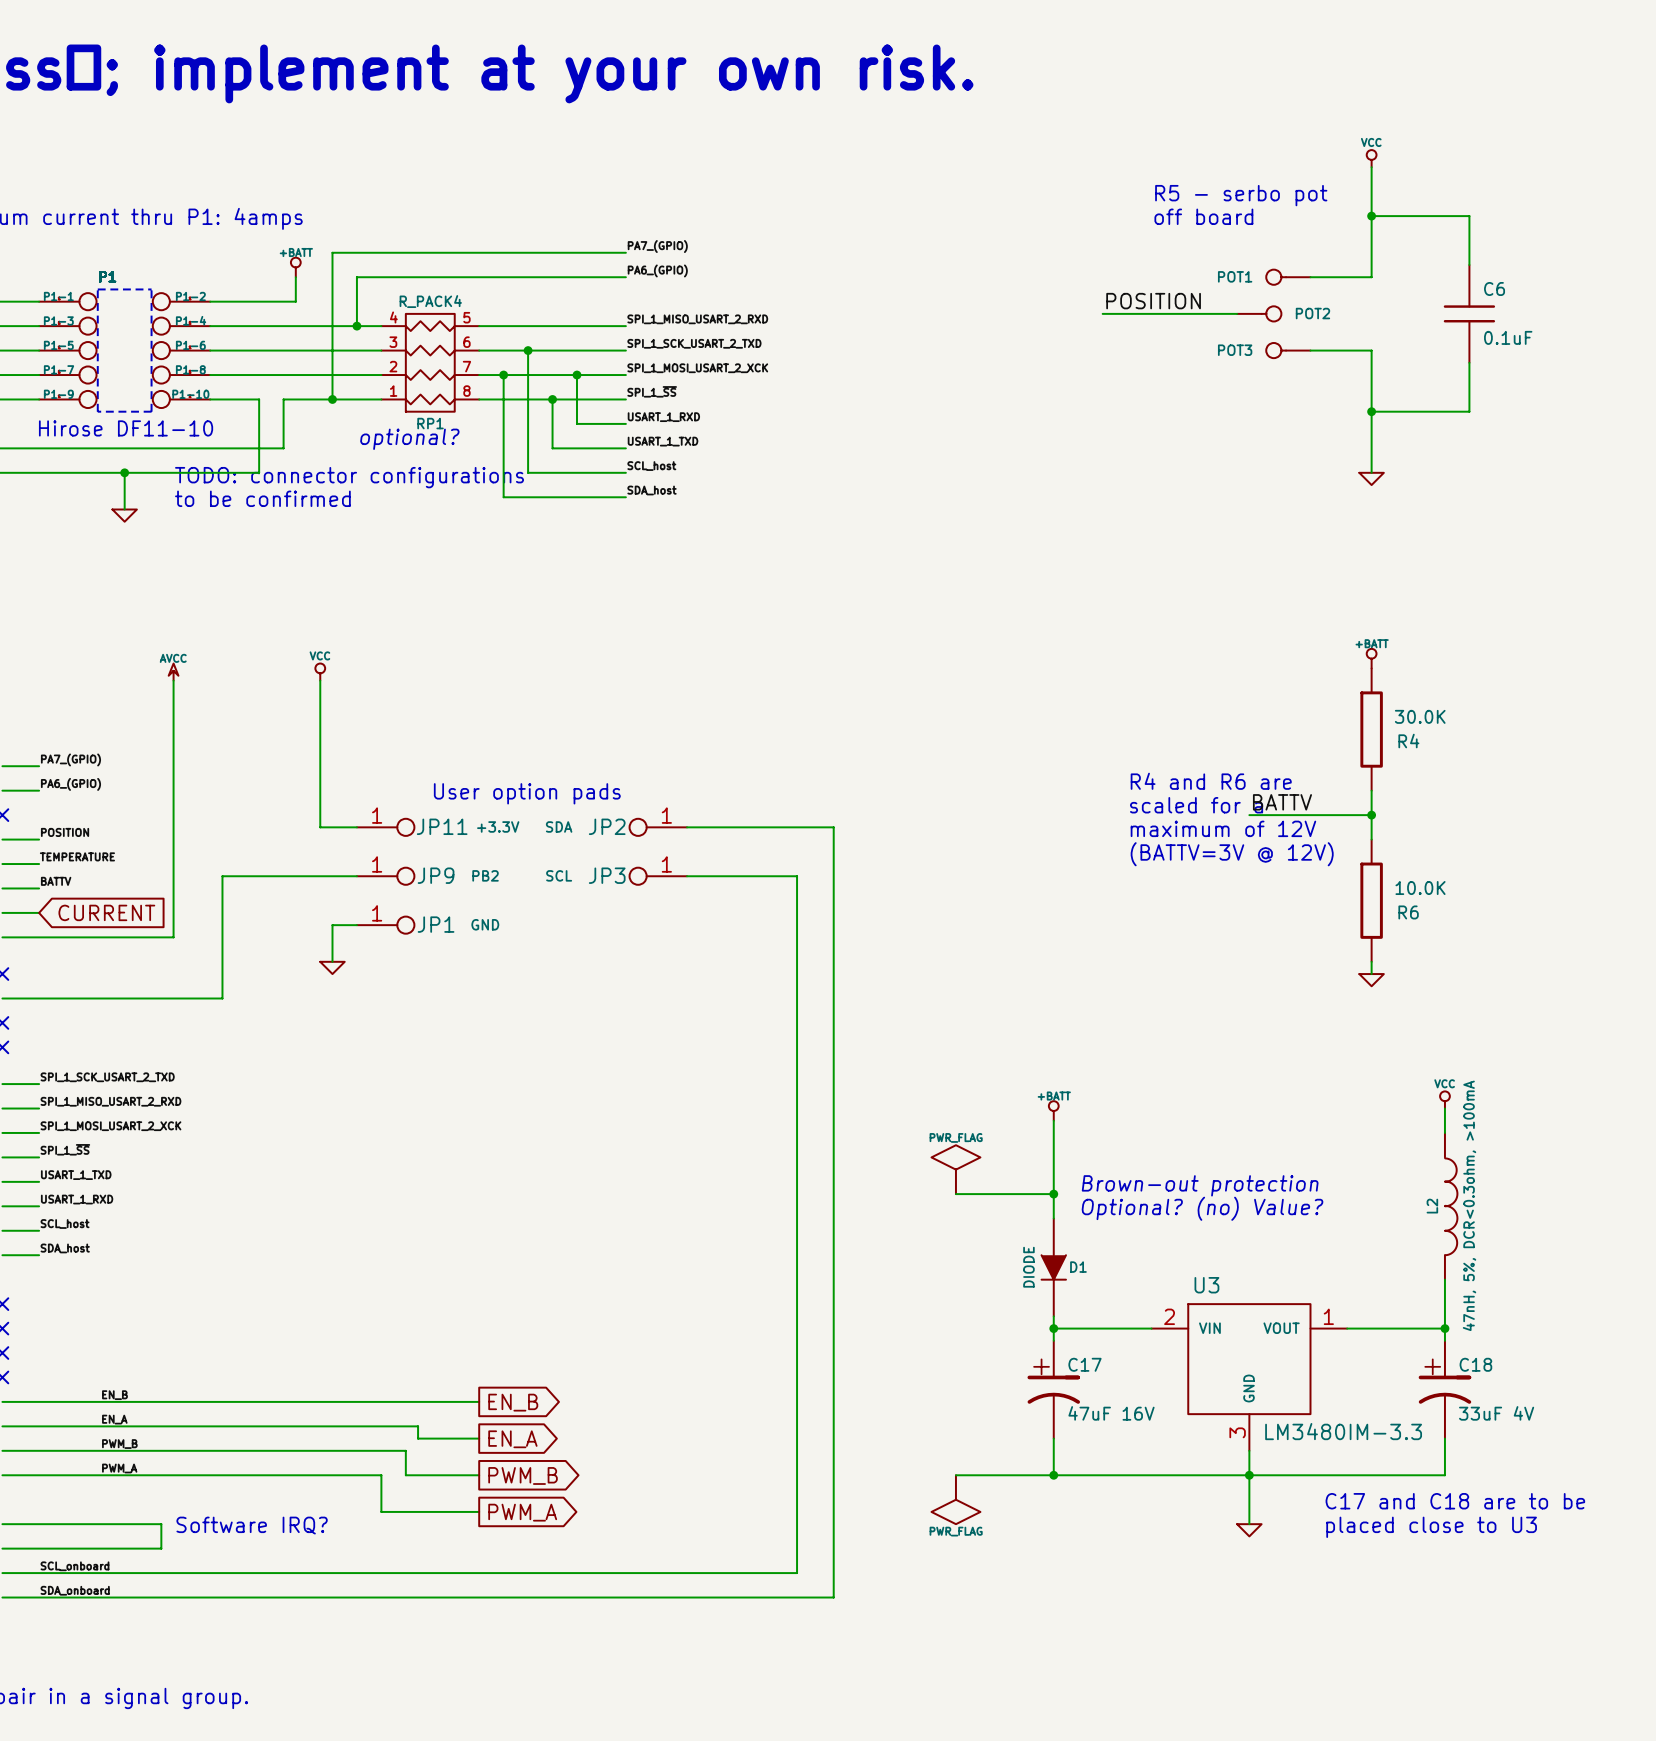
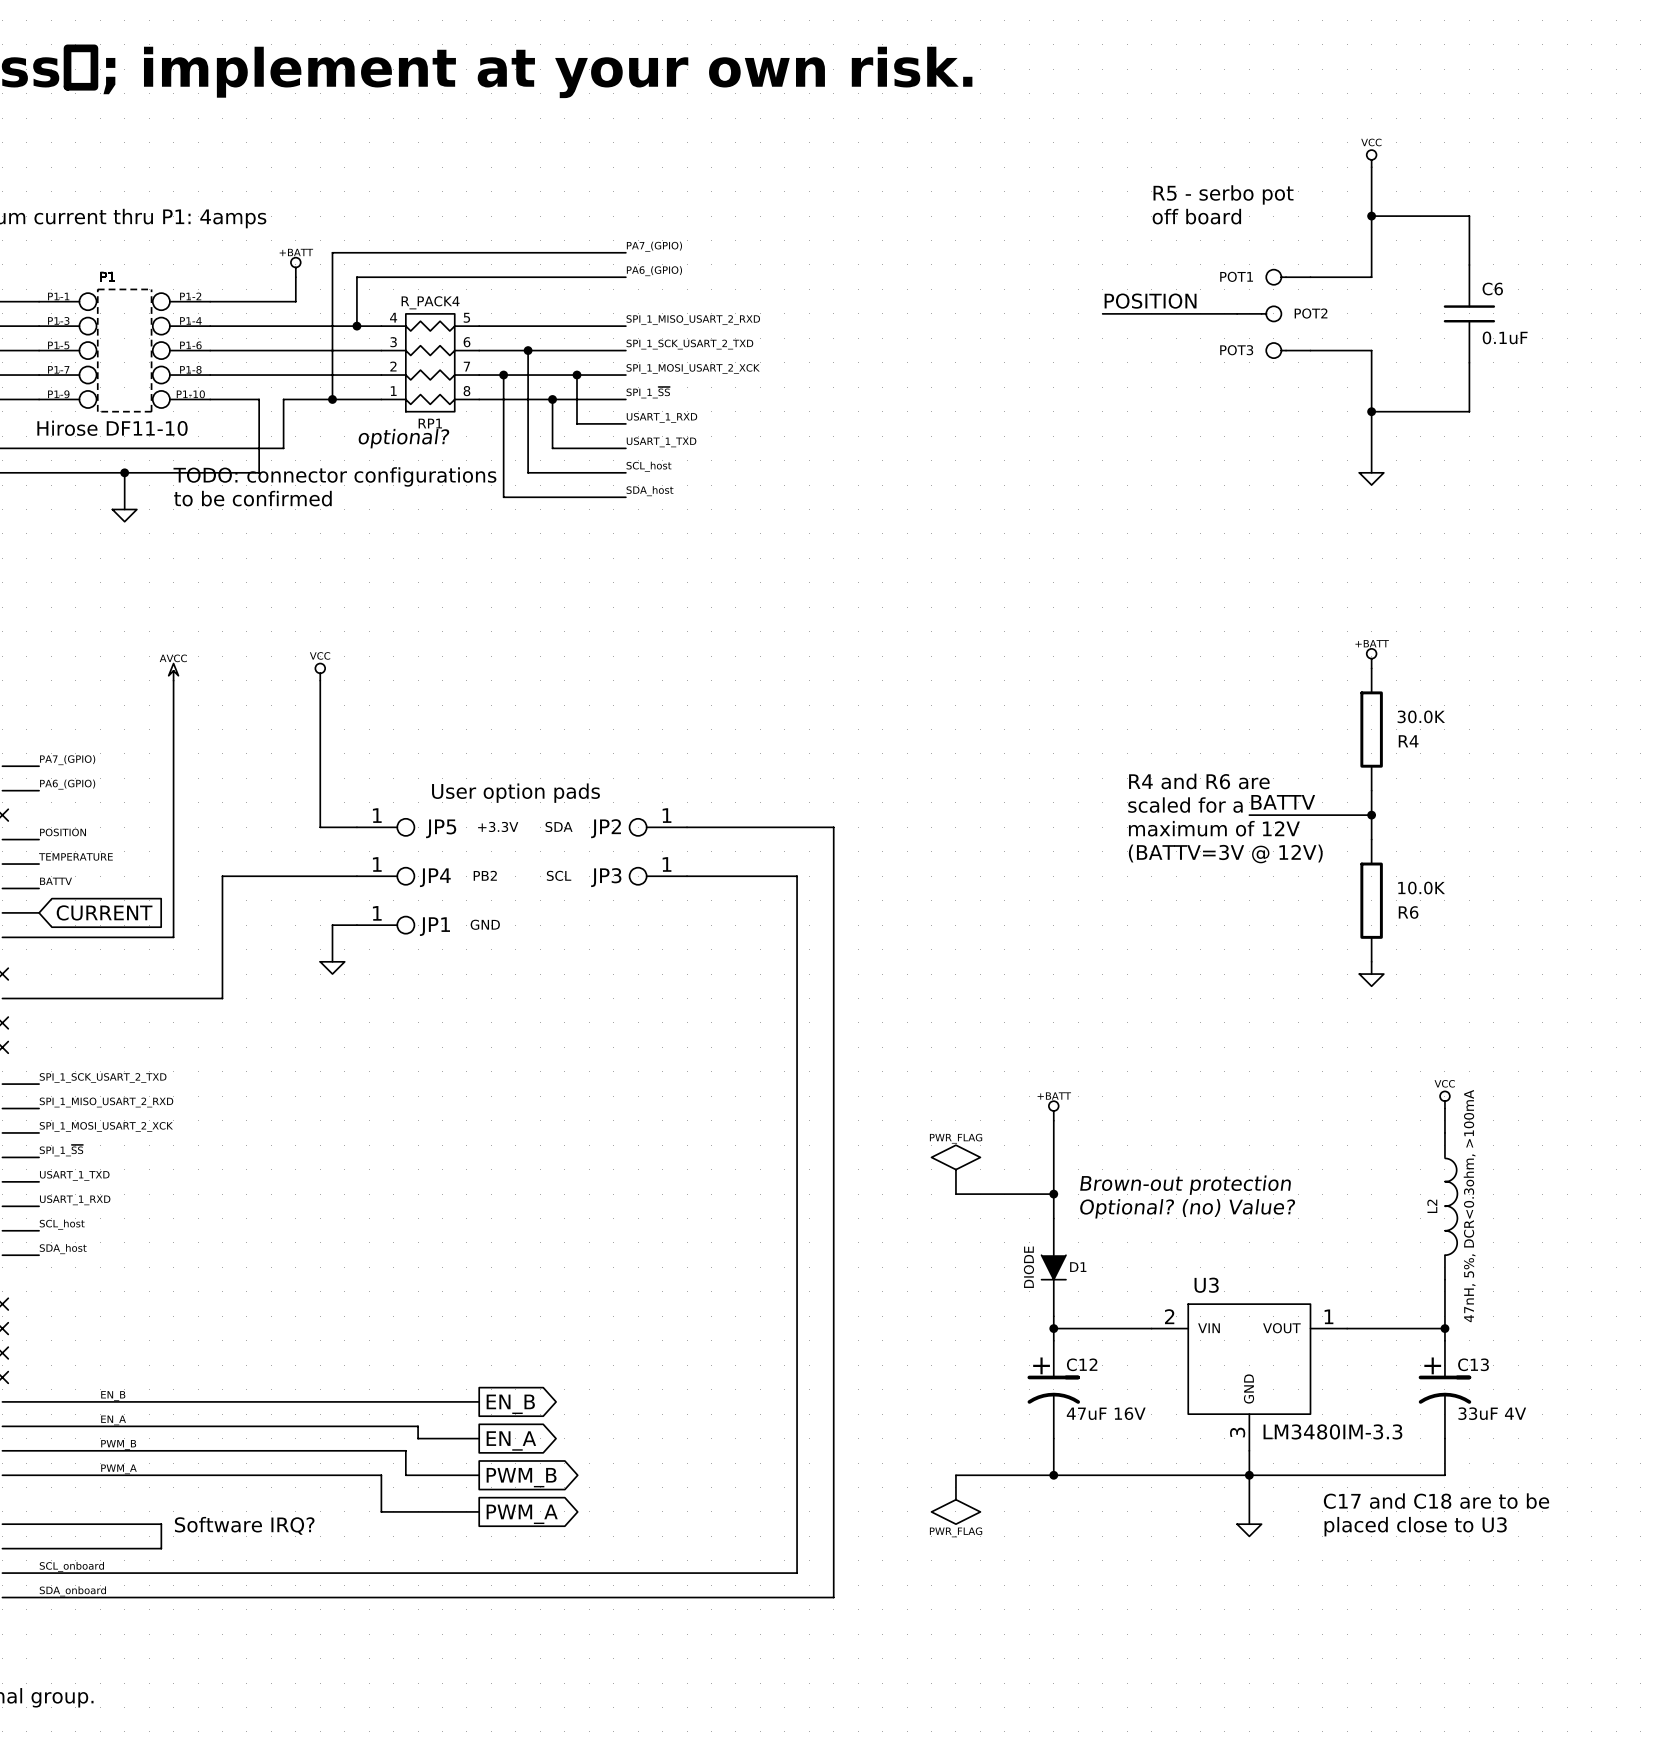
JP11 name: JP11 (442, 826) -> JP5 (441, 828)
JP9 name: JP9 (436, 875) -> JP4 (435, 877)
C17 name: C17 (1085, 1364) -> C12 (1082, 1364)
C18 name: C18 (1475, 1364) -> C13 (1473, 1364)

